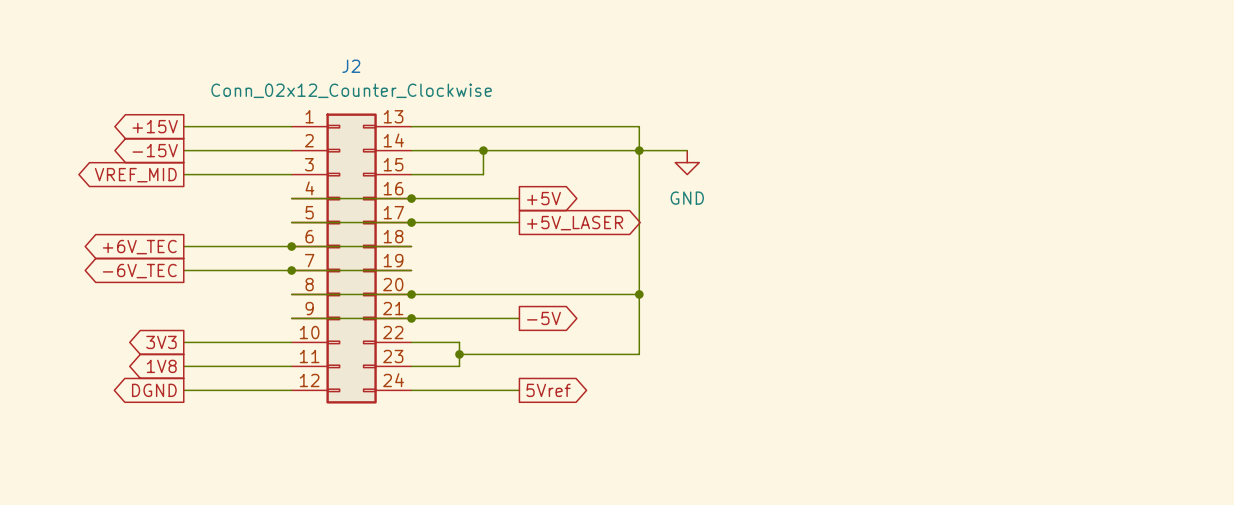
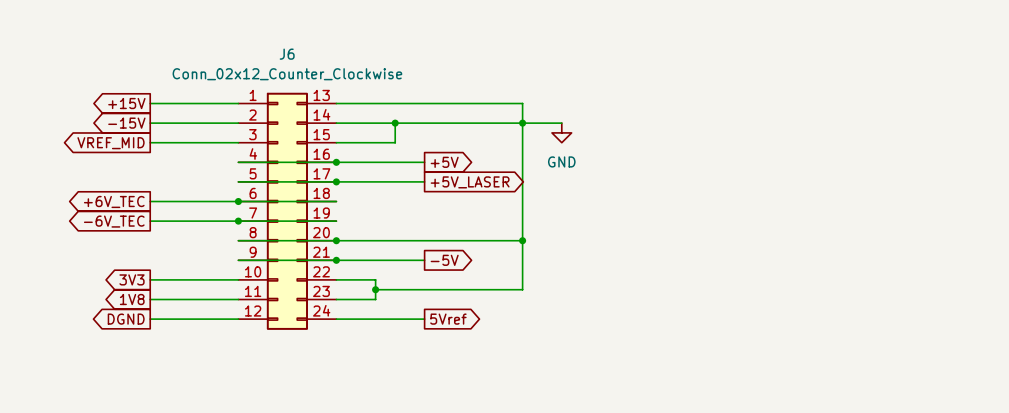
J2 name: J2 (351, 66) -> J6 (287, 54)

